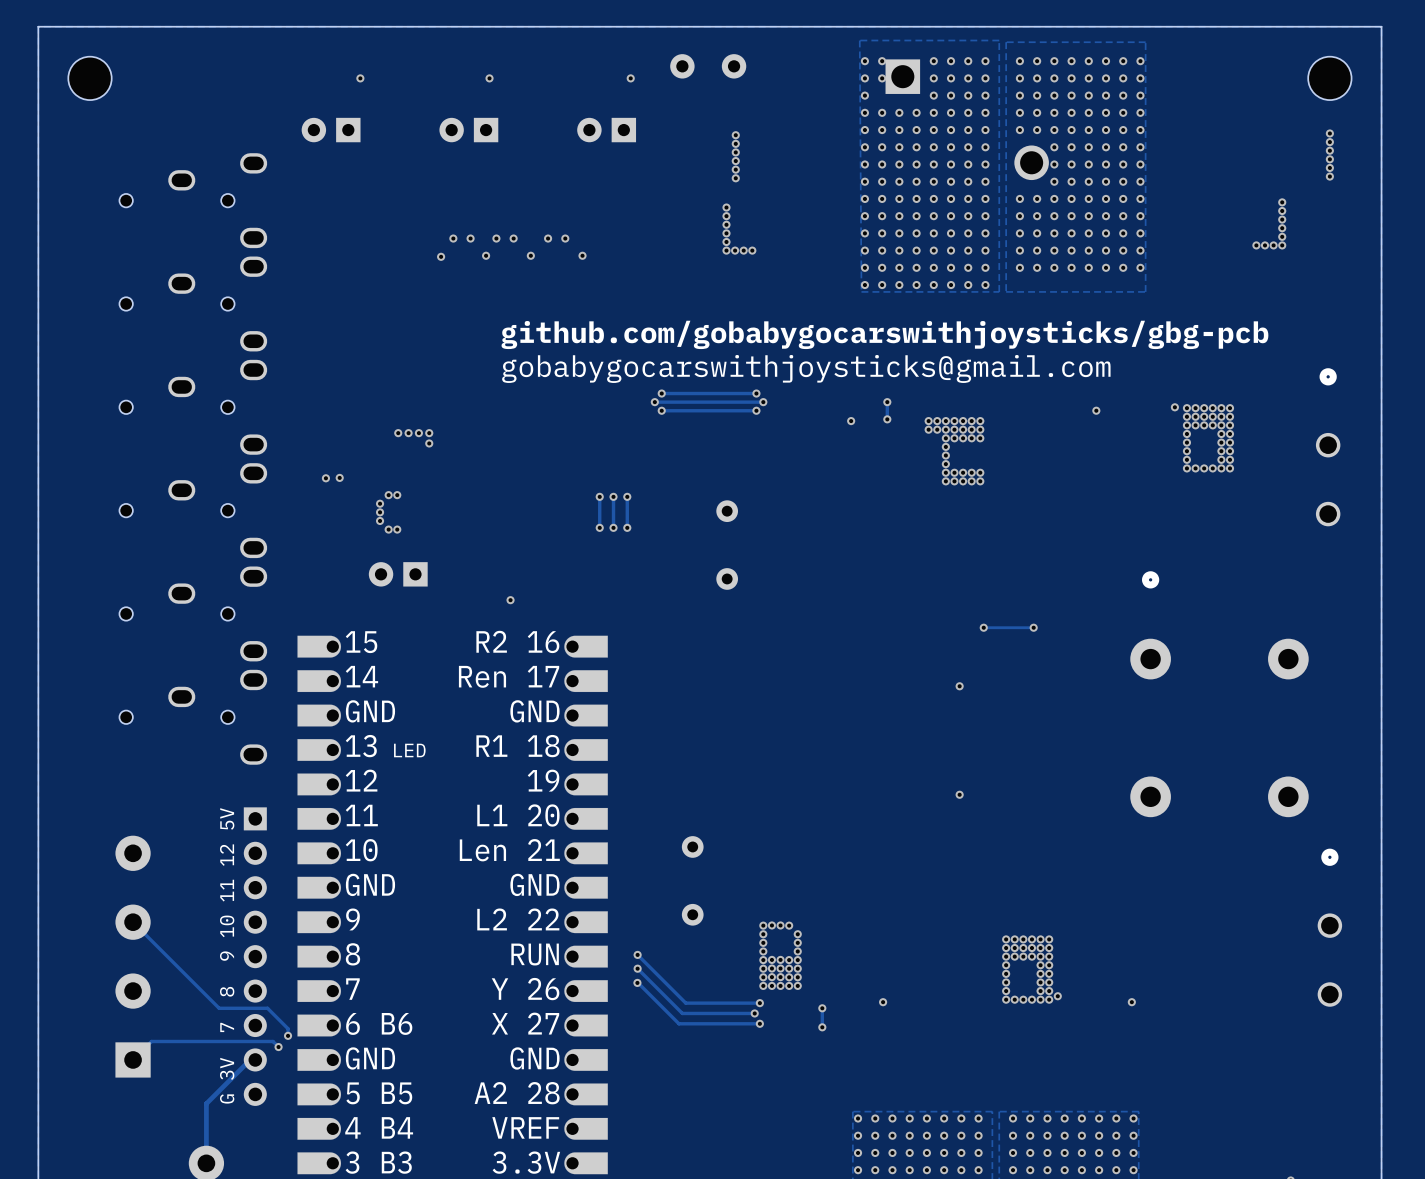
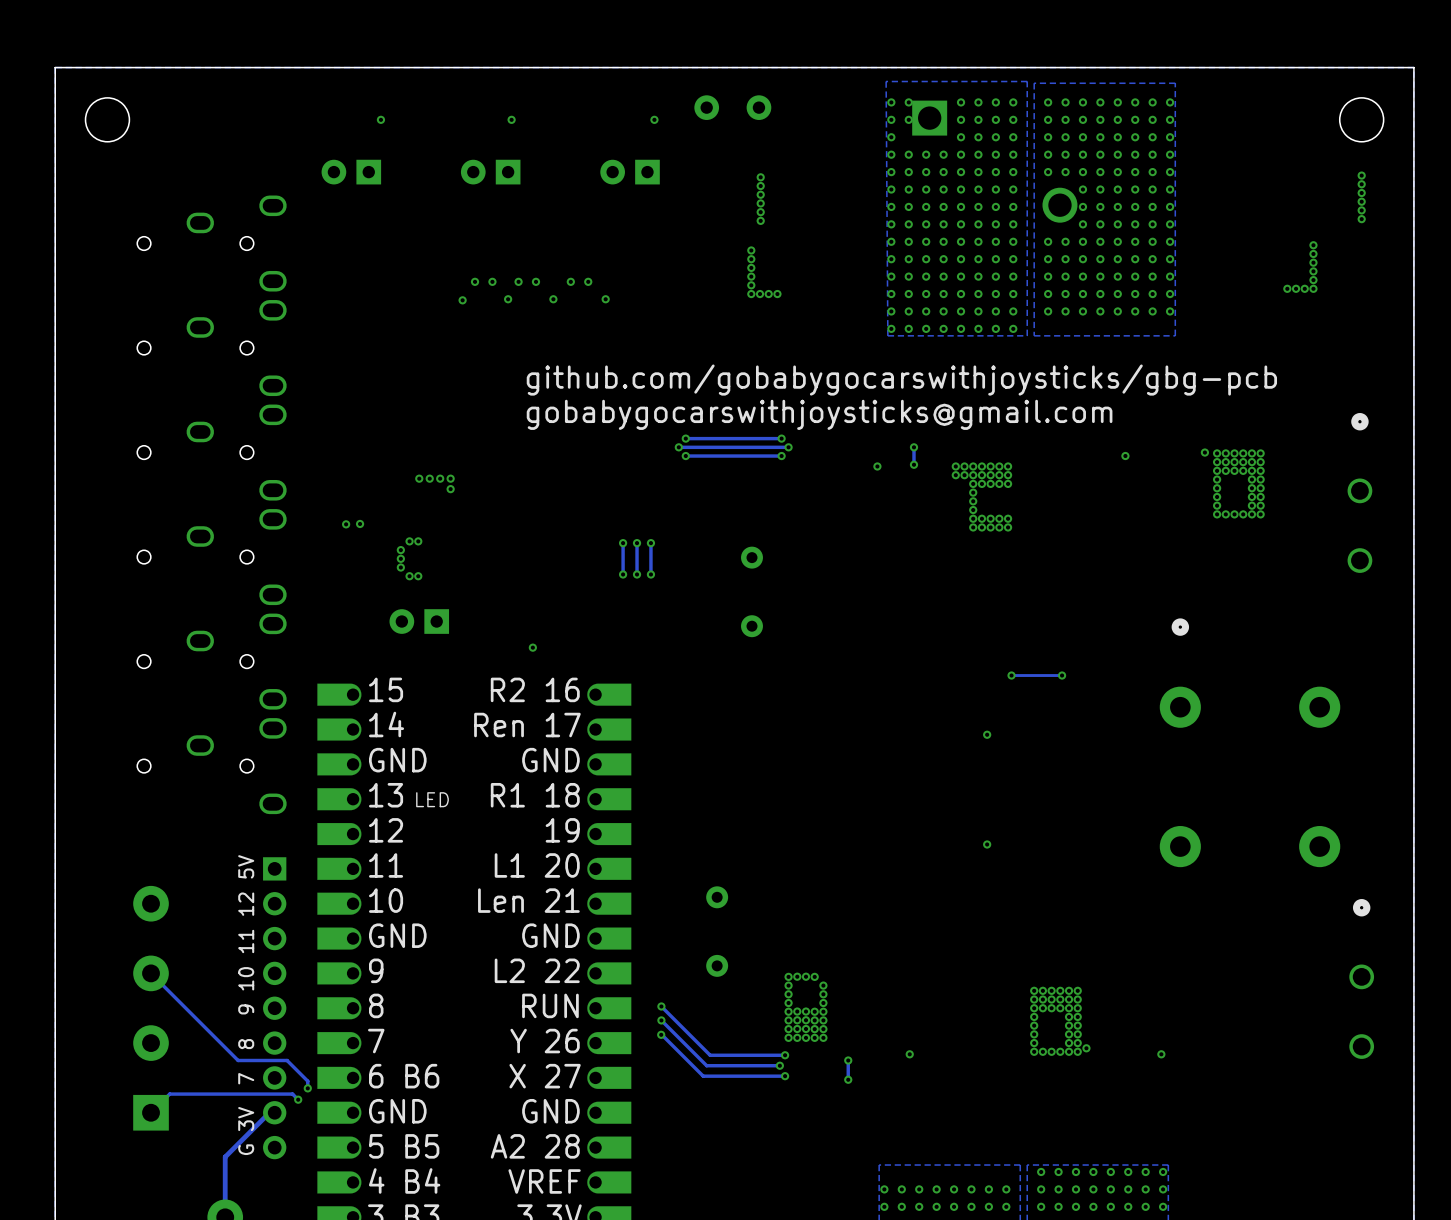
via: (858, 1118) -> none
via: (875, 1118) -> none
via: (892, 1118) -> none
via: (909, 1118) -> none
via: (926, 1118) -> none
via: (944, 1118) -> none
via: (961, 1118) -> none
via: (978, 1118) -> none

